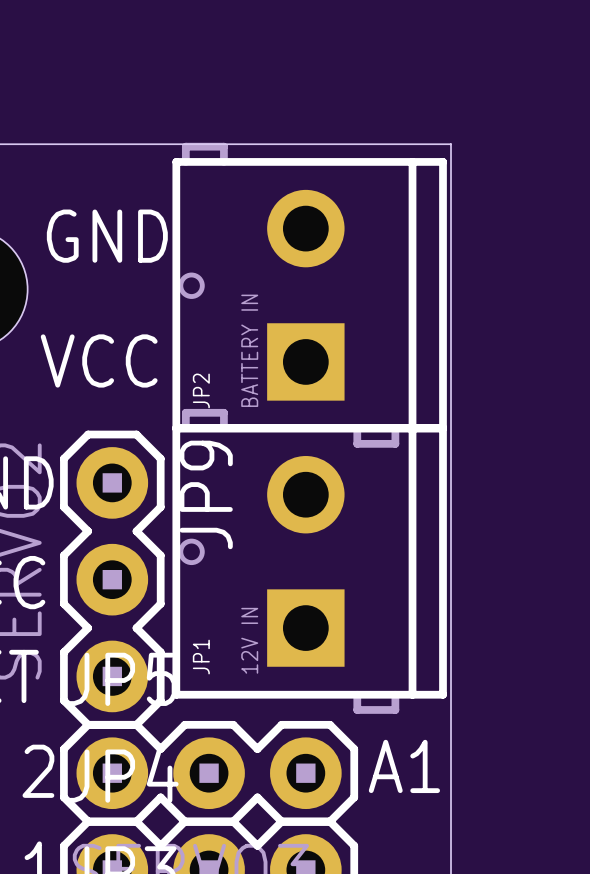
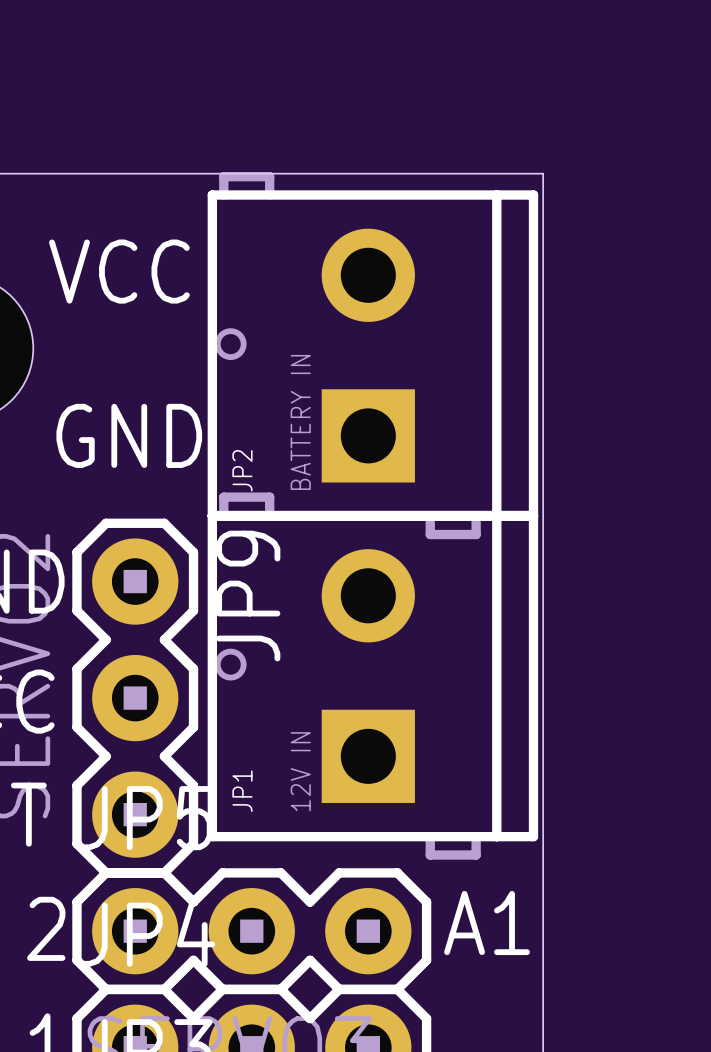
text: GND (107, 236) -> VCC (119, 271)
text: VCC (99, 360) -> GND (129, 435)

